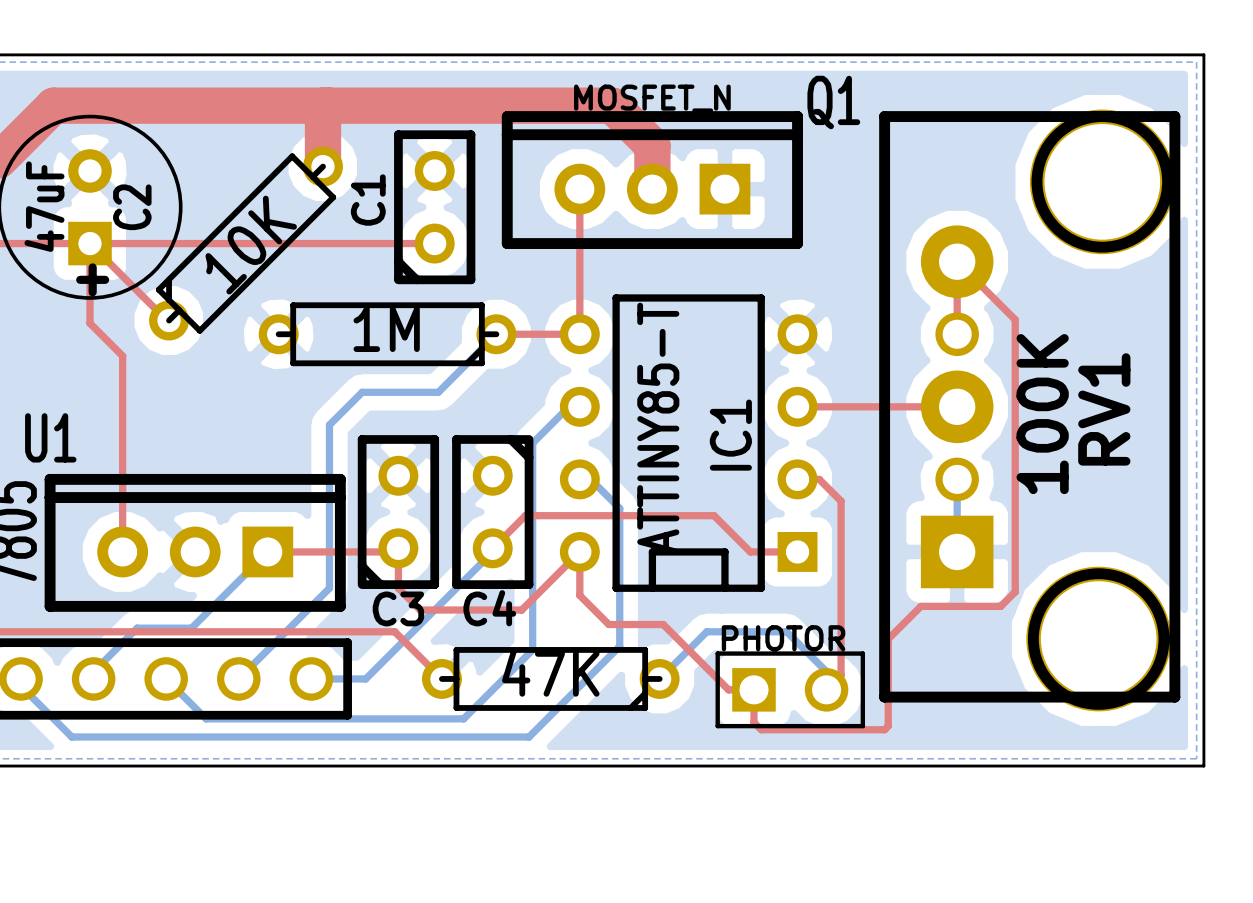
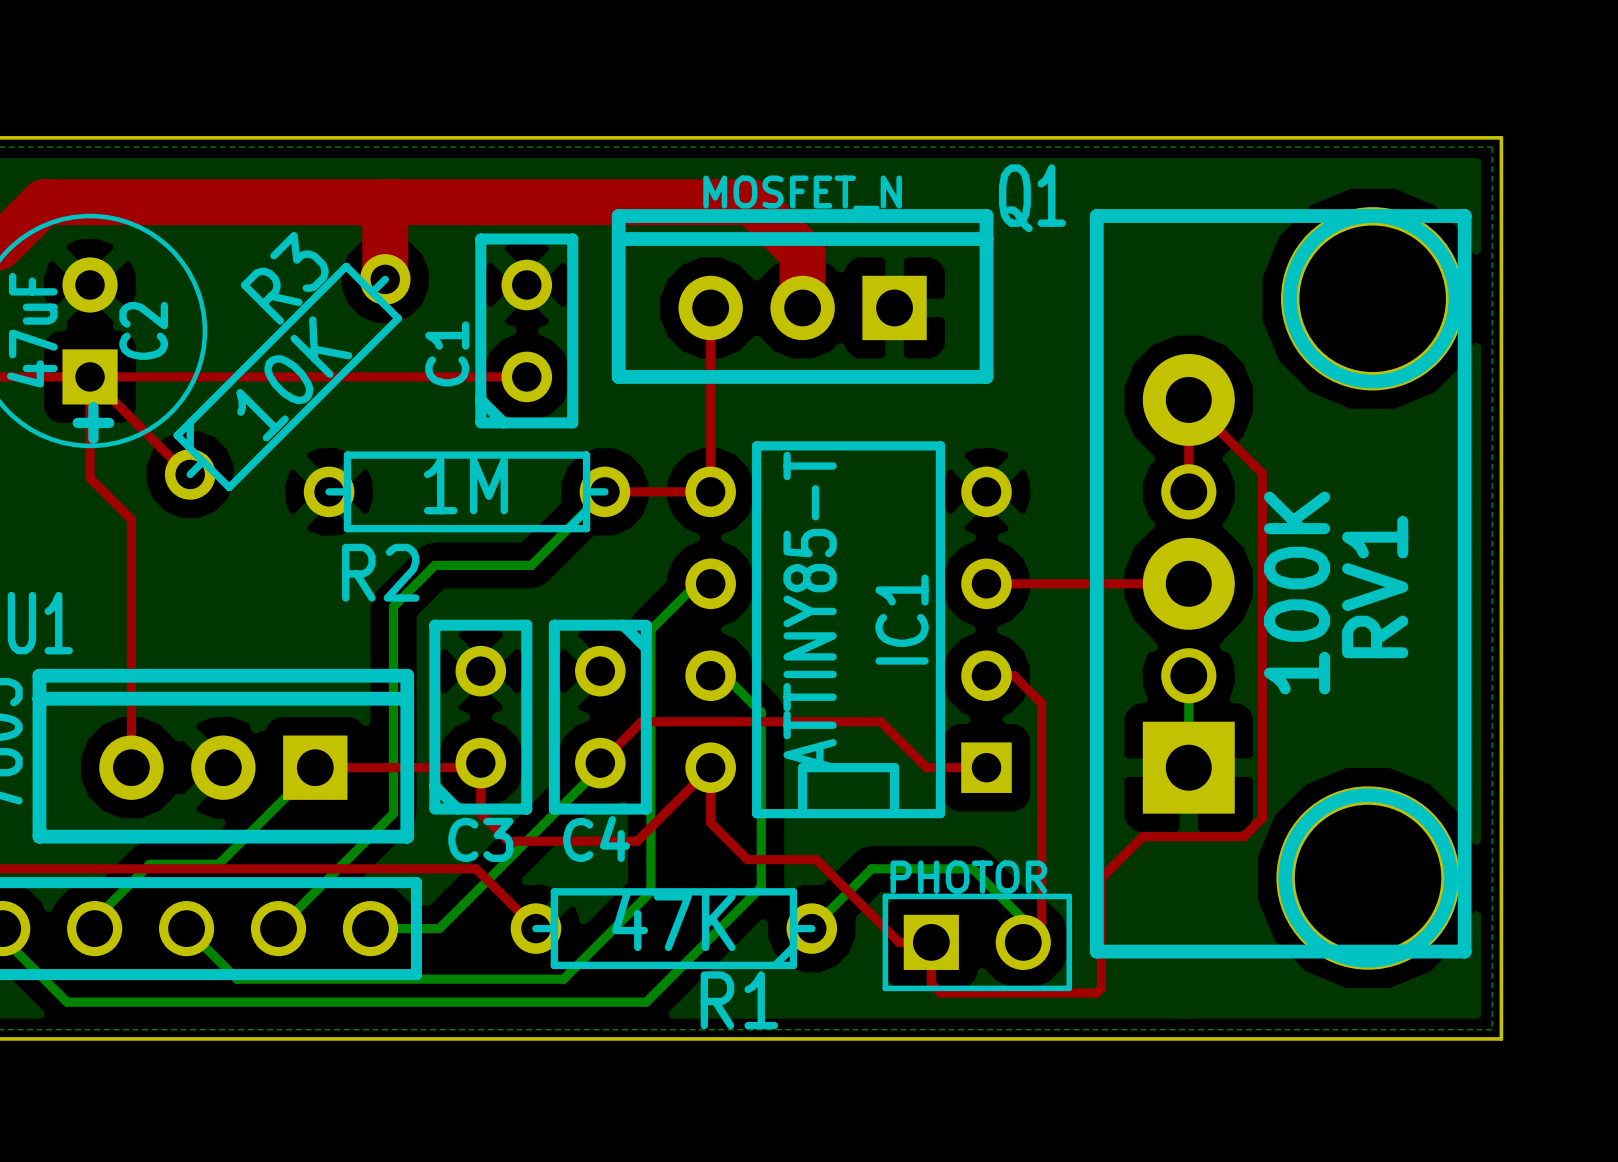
R3 name: none -> R3 (284, 278)
C1 name position: C1 (368, 200) -> C1 (447, 353)
R2 name: none -> R2 (380, 572)
R1 name: none -> R1 (739, 1000)

